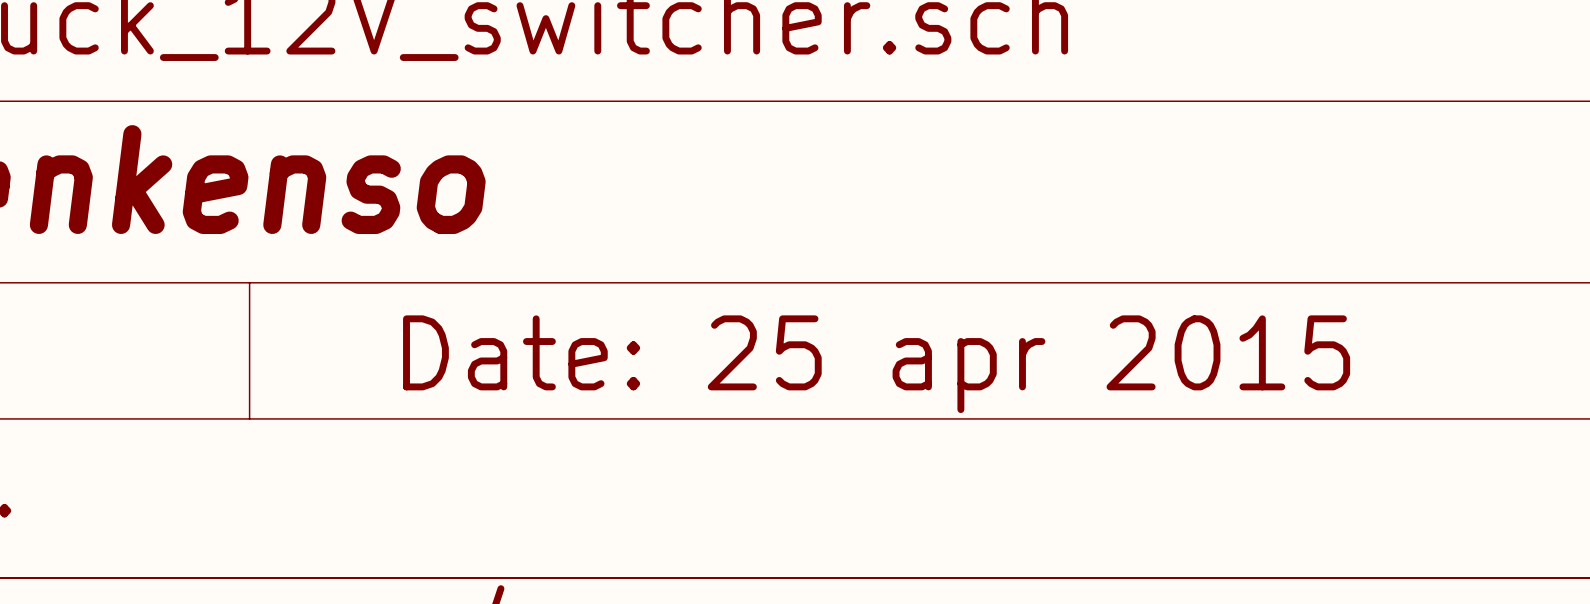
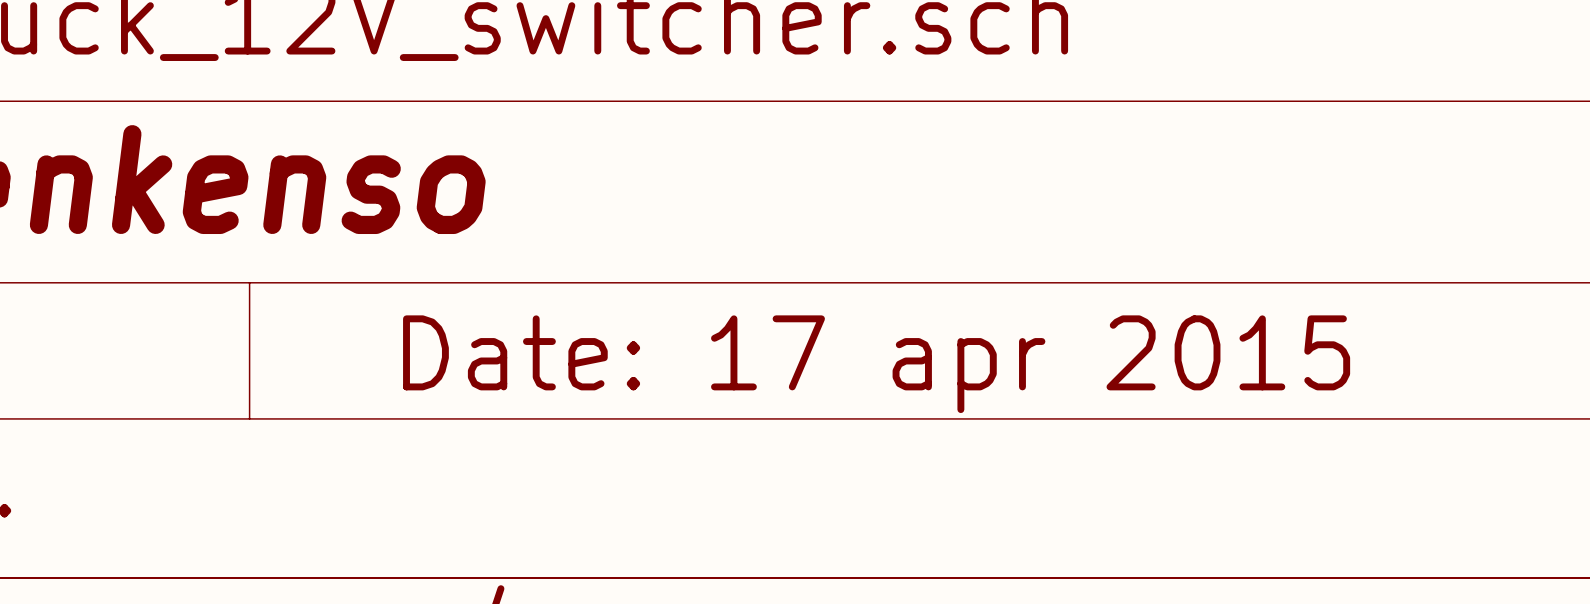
title block: Date: 25 apr 2015 (876, 364) -> Date: 17 apr 2015 (876, 364)

